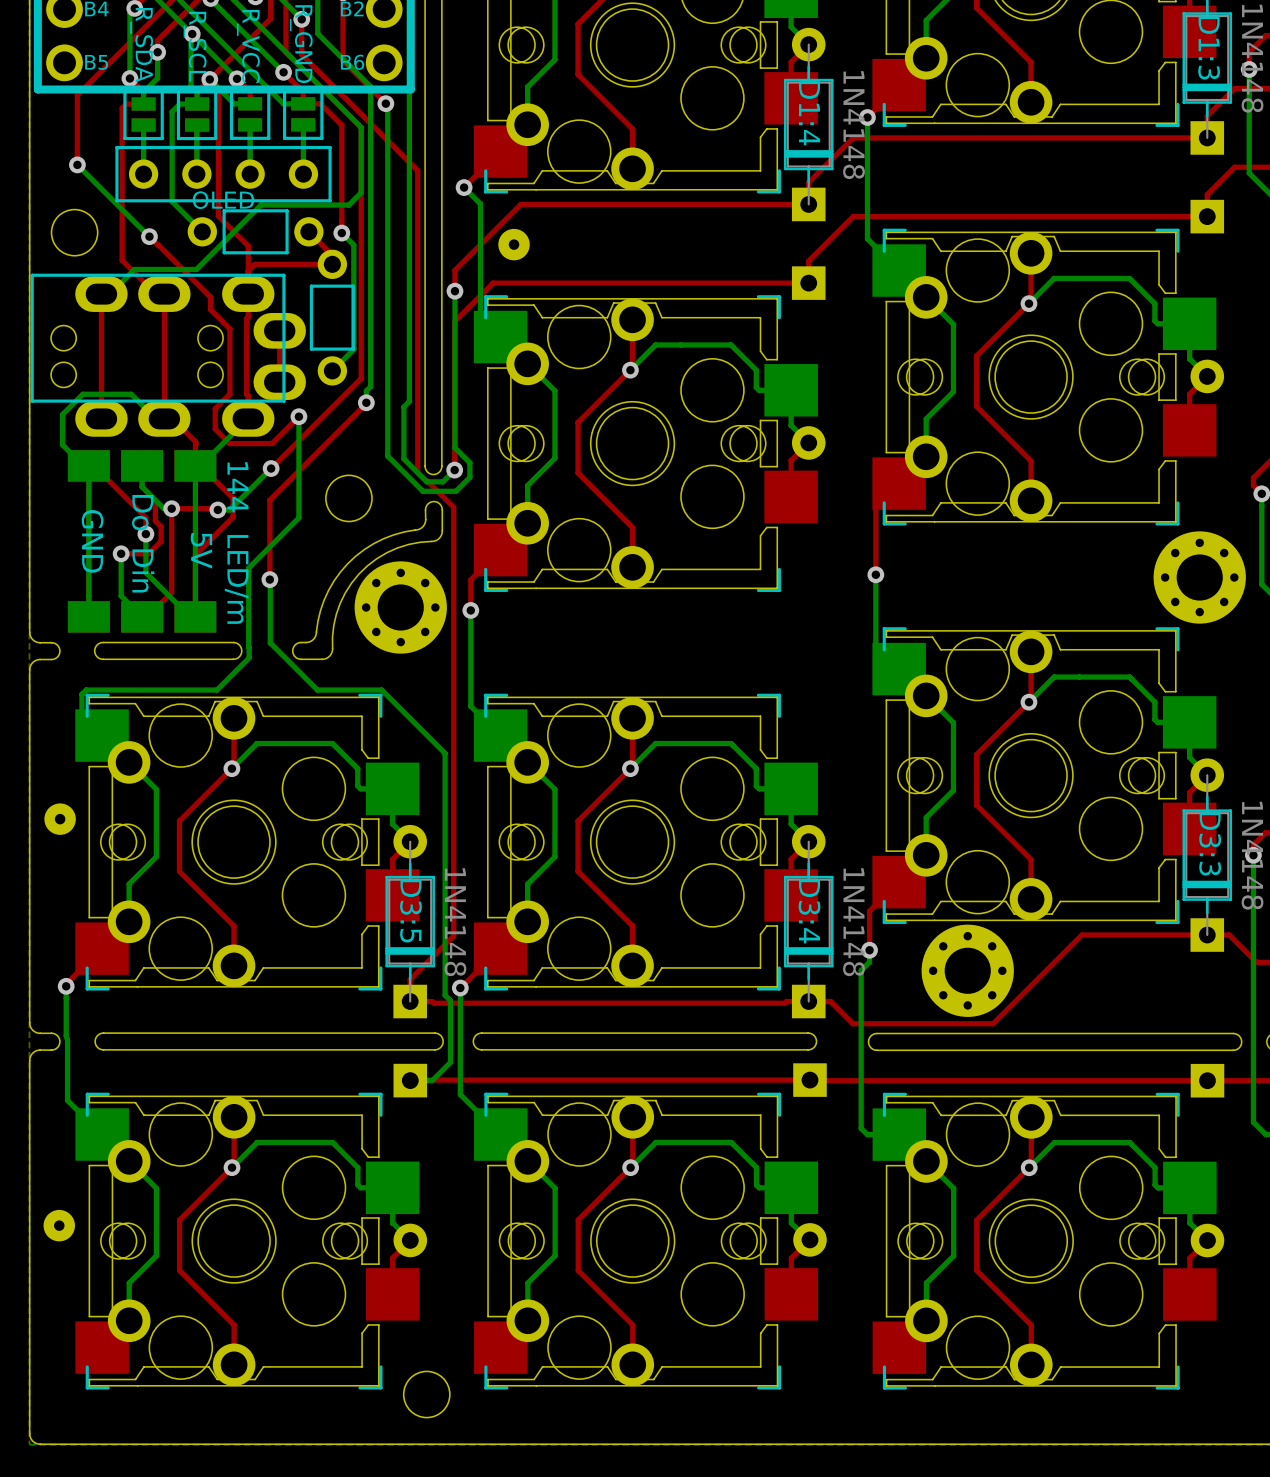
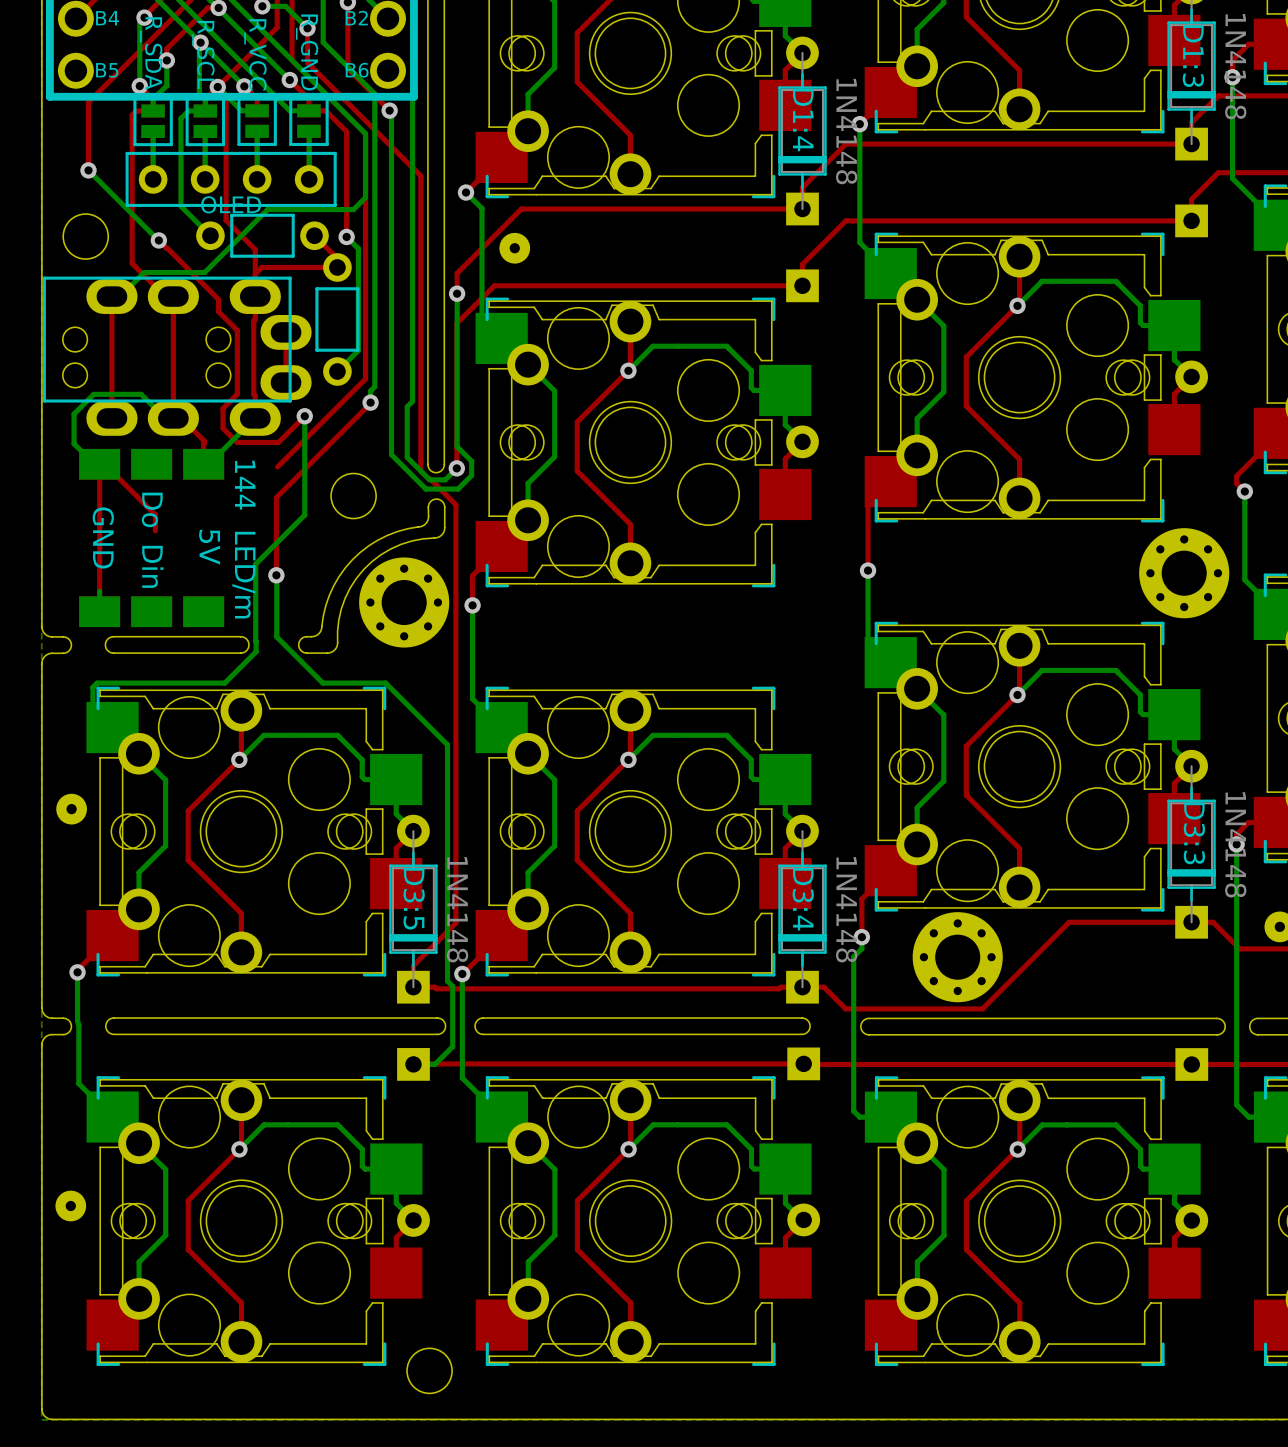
bottom track: (88, 465) (88, 595) -> none
top track: (142, 465) (142, 486) (155, 500) (155, 521) (161, 526) (161, 541) (148, 553) (121, 553) -> none
bottom track: (142, 465) (142, 486) (163, 508) (171, 508) -> none
top track: (195, 465) (200, 465) (233, 498) (233, 517) (195, 554) (195, 616) -> none
bottom track: (195, 465) (195, 616) (190, 616) (145, 572) (145, 534) -> none
bottom track: (271, 468) (229, 509) (217, 509) -> none
via: (271, 468) -> none
via: (171, 508) -> none
top track: (217, 509) (171, 508) (171, 592) (147, 616) (142, 616) -> none
via: (217, 509) -> none
via: (145, 534) -> none
bottom track: (121, 553) (121, 595) (142, 616) -> none
via: (121, 553) -> none

